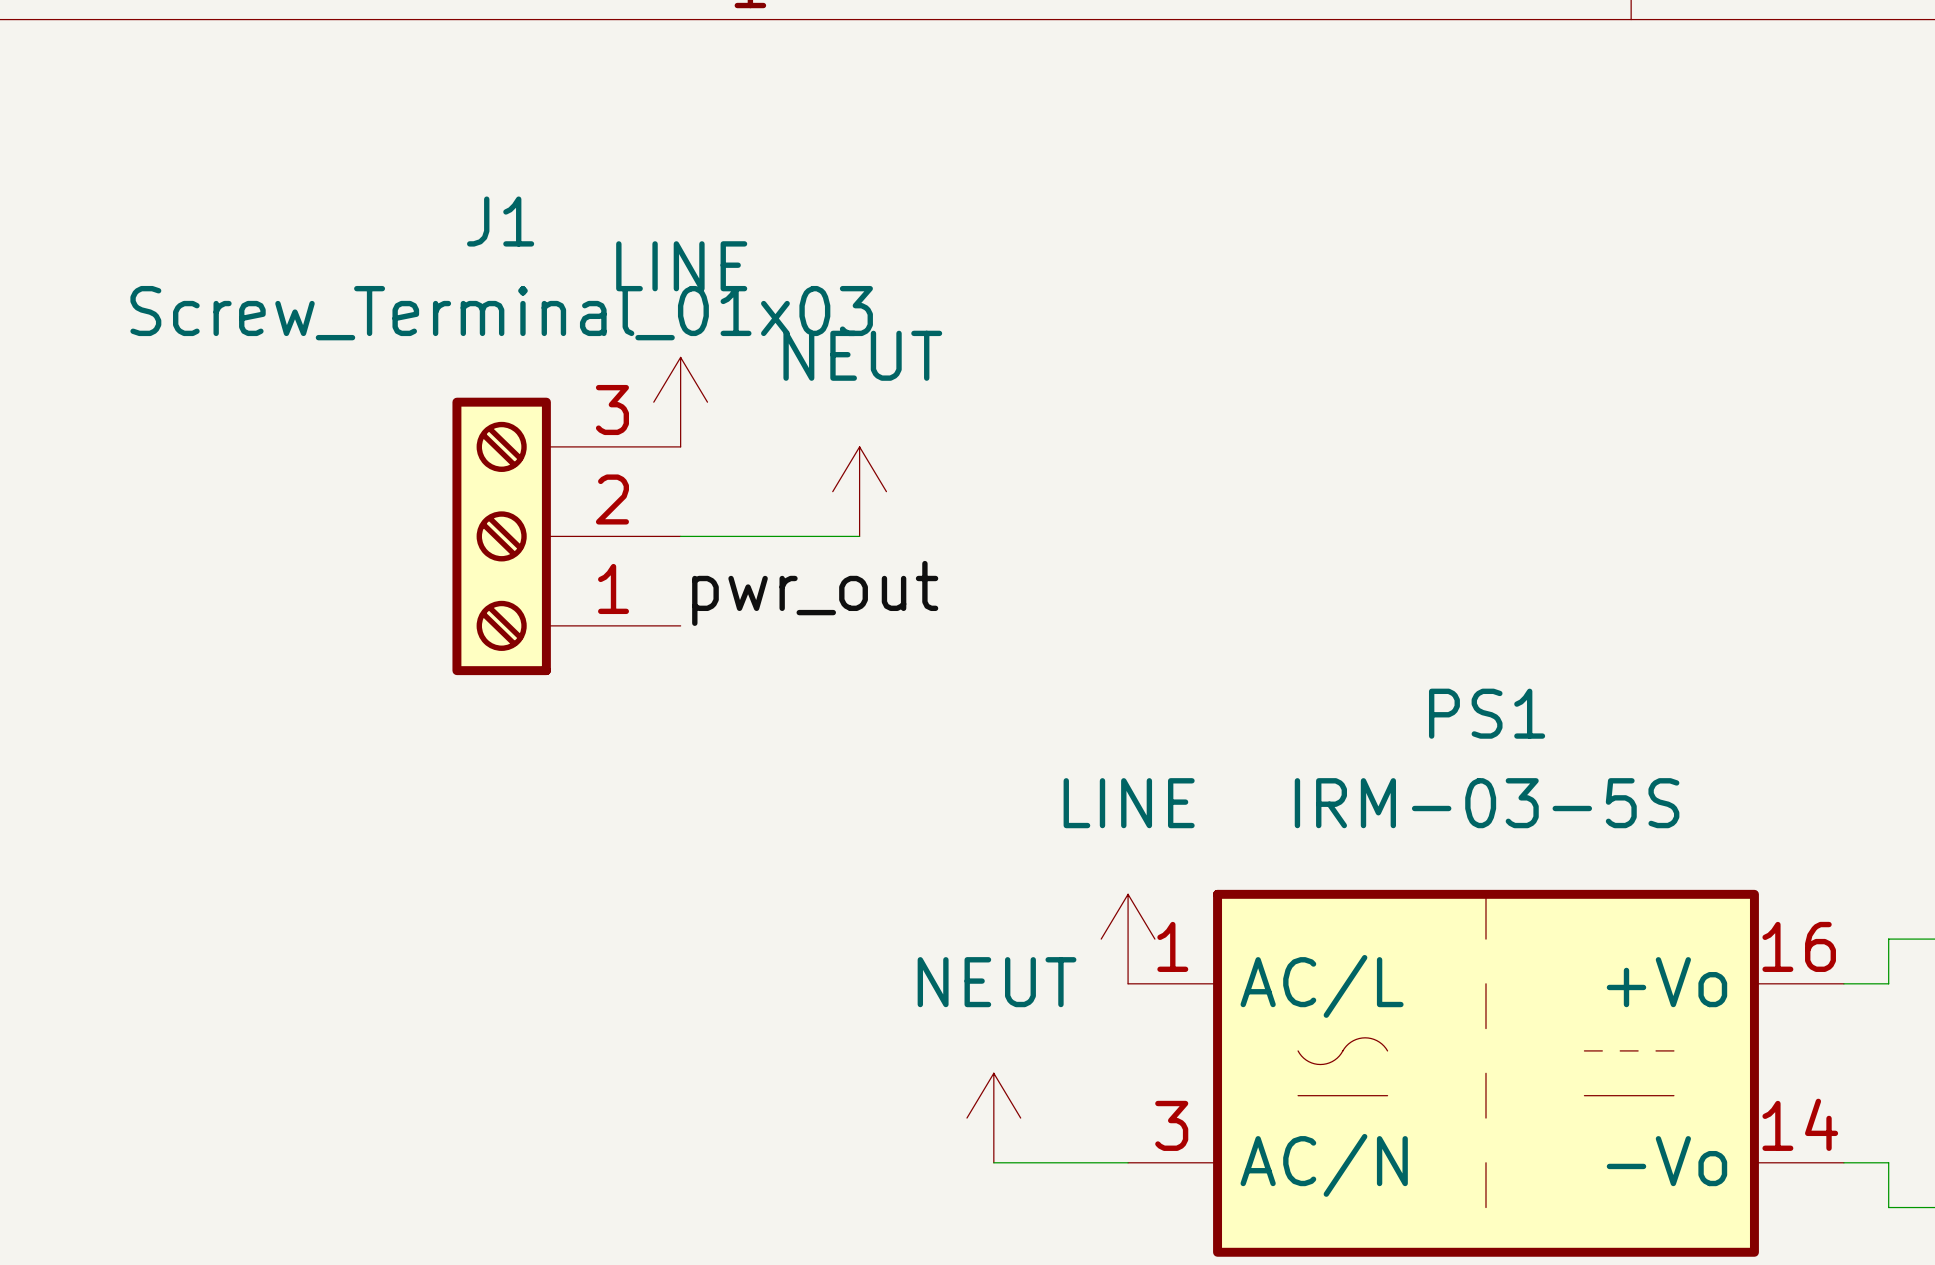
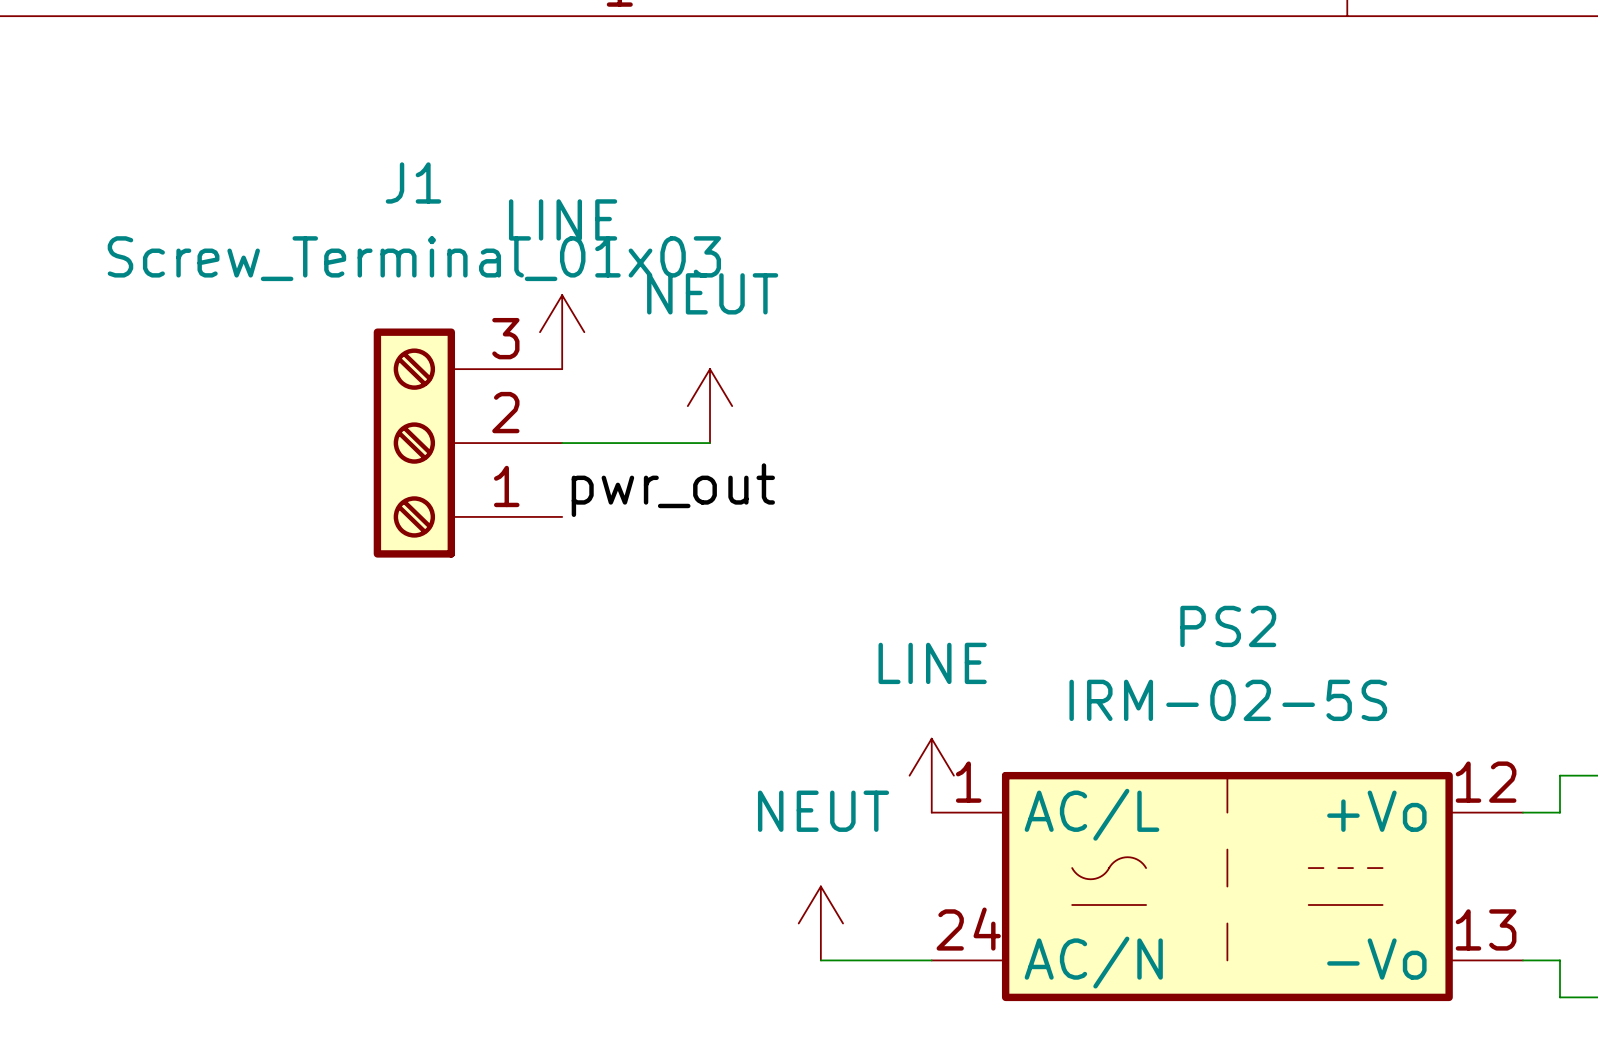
PS1: IRM-03-5S (1485, 1073) -> none
PS2: none -> IRM-02-5S (1227, 886)

